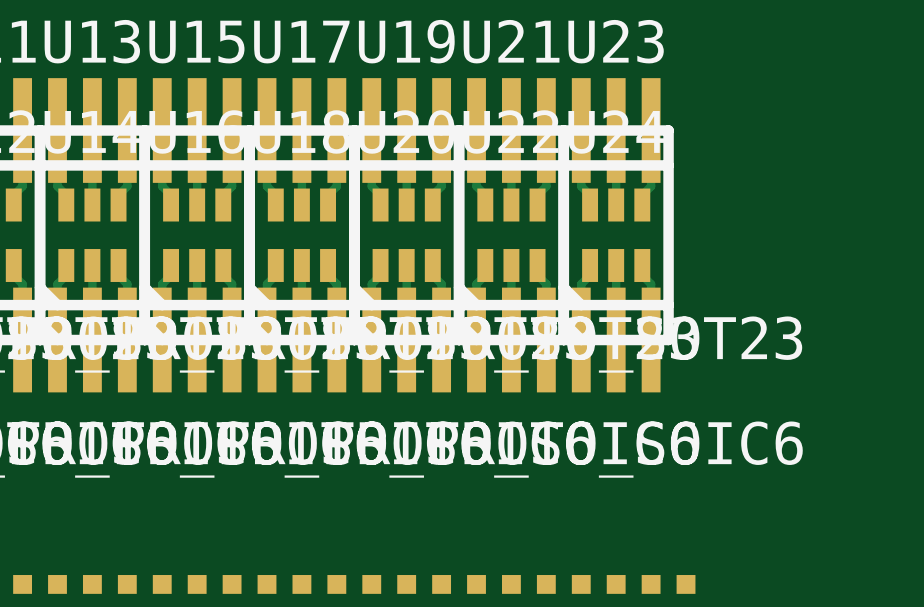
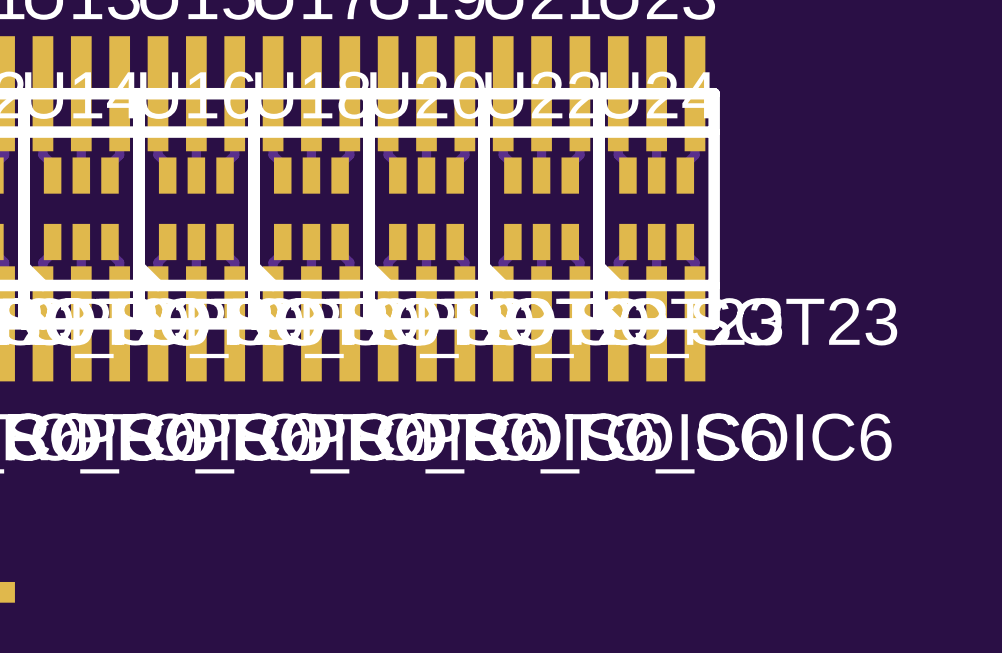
part: (57, 584) -> none
part: (92, 584) -> none
part: (127, 584) -> none
part: (162, 584) -> none
part: (197, 584) -> none
part: (232, 584) -> none
part: (267, 584) -> none
part: (301, 584) -> none
part: (336, 584) -> none
part: (371, 584) -> none
part: (406, 584) -> none
part: (441, 584) -> none
part: (476, 584) -> none
part: (511, 584) -> none
part: (546, 584) -> none
part: (581, 584) -> none
part: (616, 584) -> none
part: (651, 584) -> none
part: (686, 584) -> none

